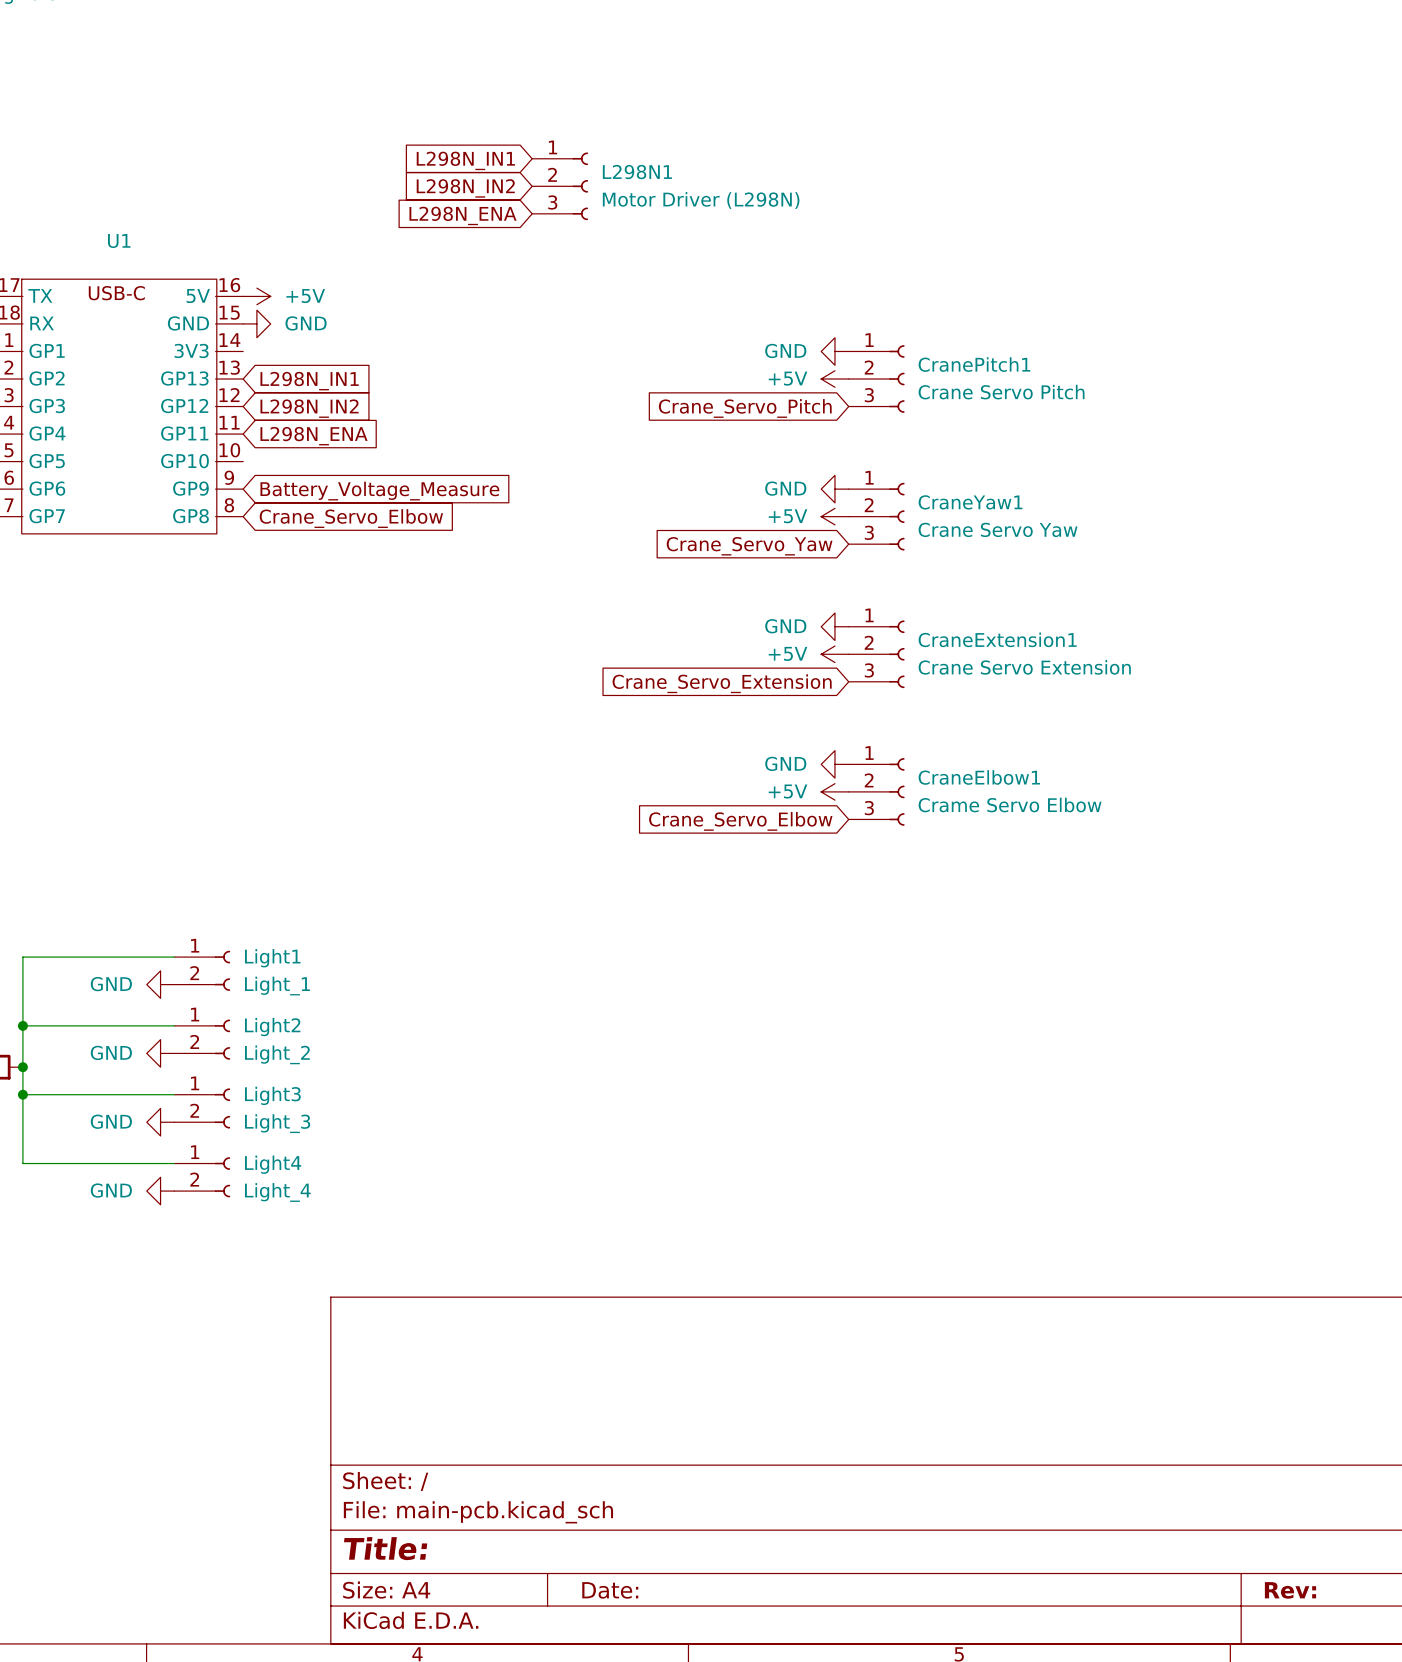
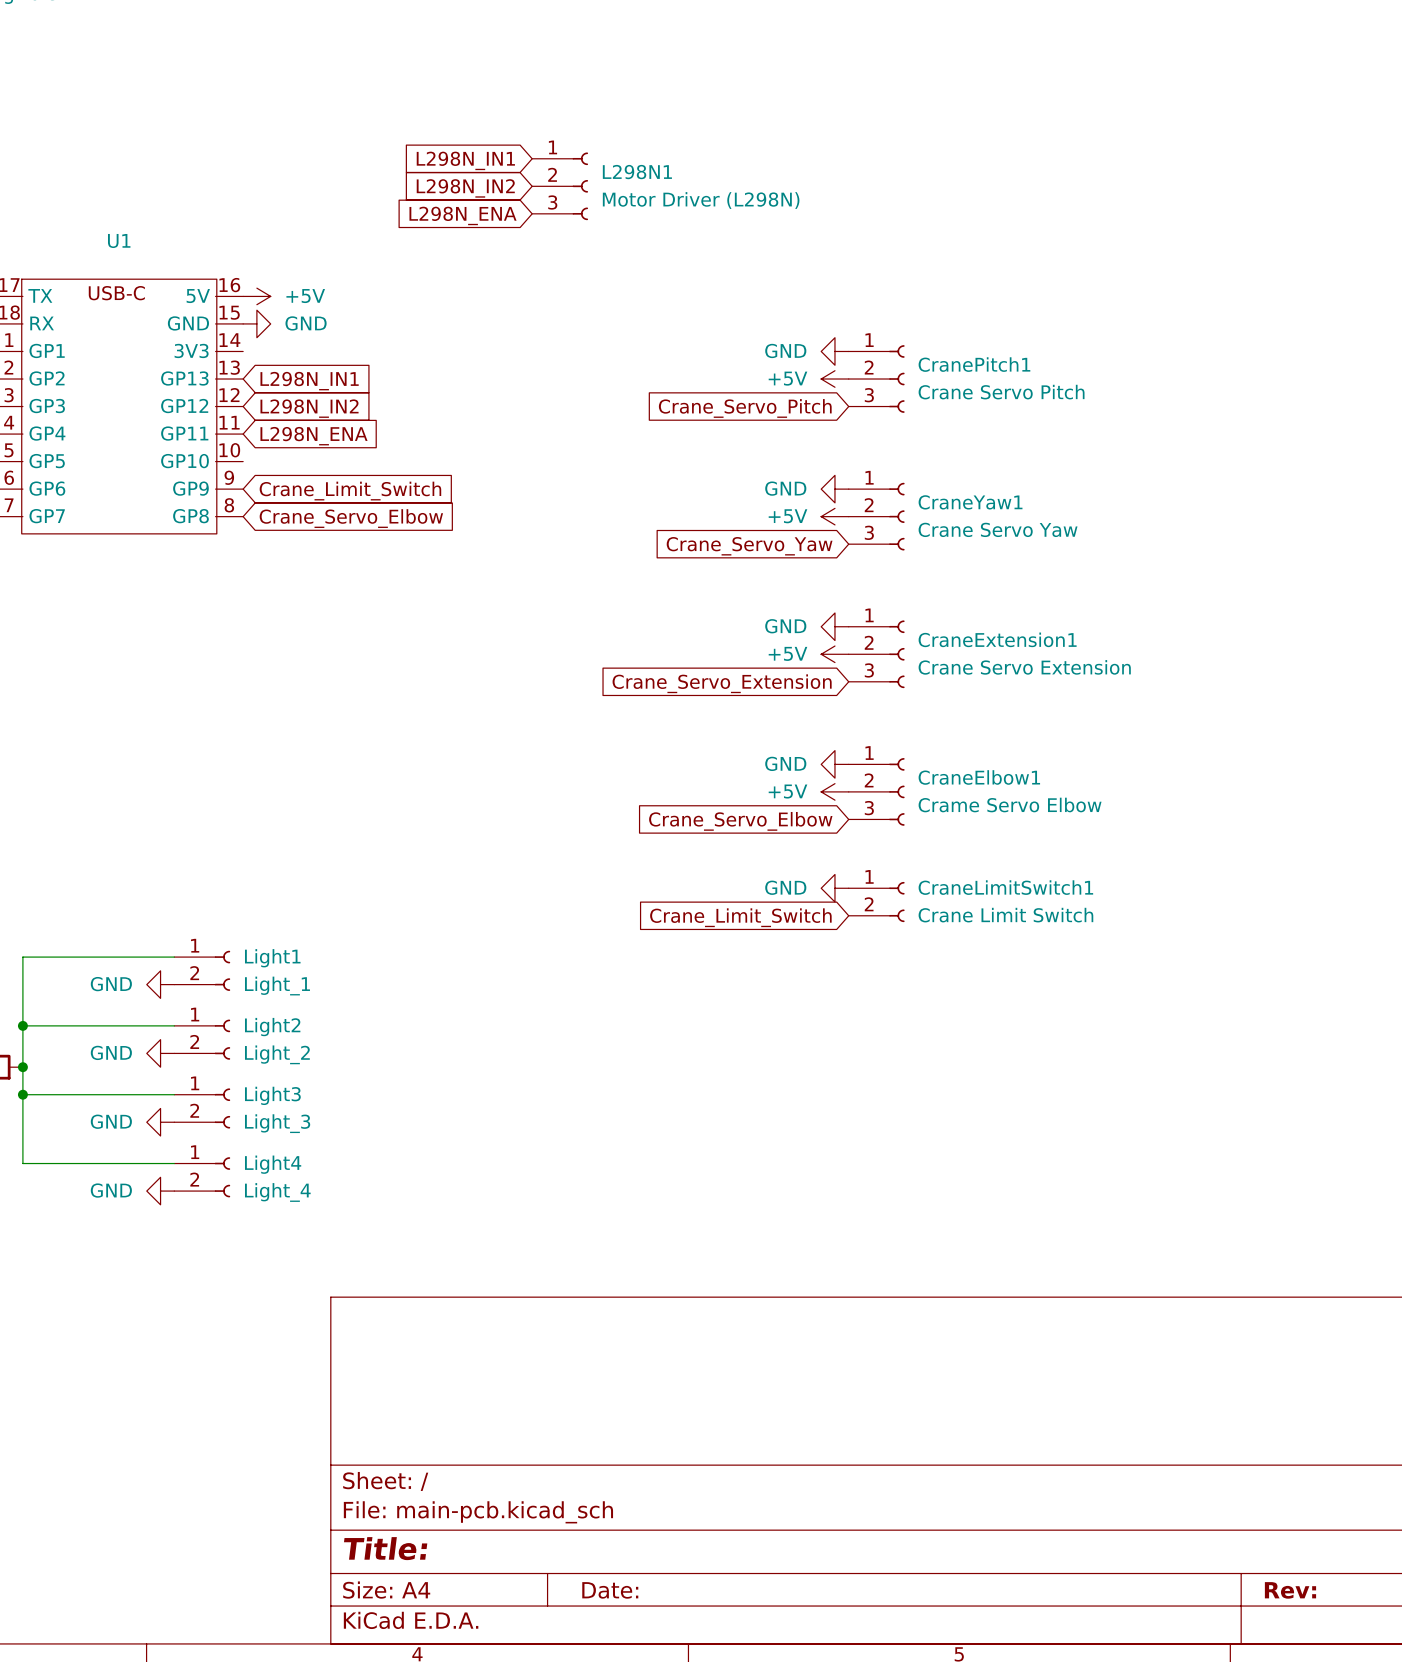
global label: Battery_Voltage_Measure (379, 491) -> Crane_Limit_Switch (350, 491)
power symbol: none -> GND (834, 888)
CraneLimitSwitch1: none -> Crane Limit Switch (876, 902)
global label: none -> Crane_Limit_Switch (740, 917)

